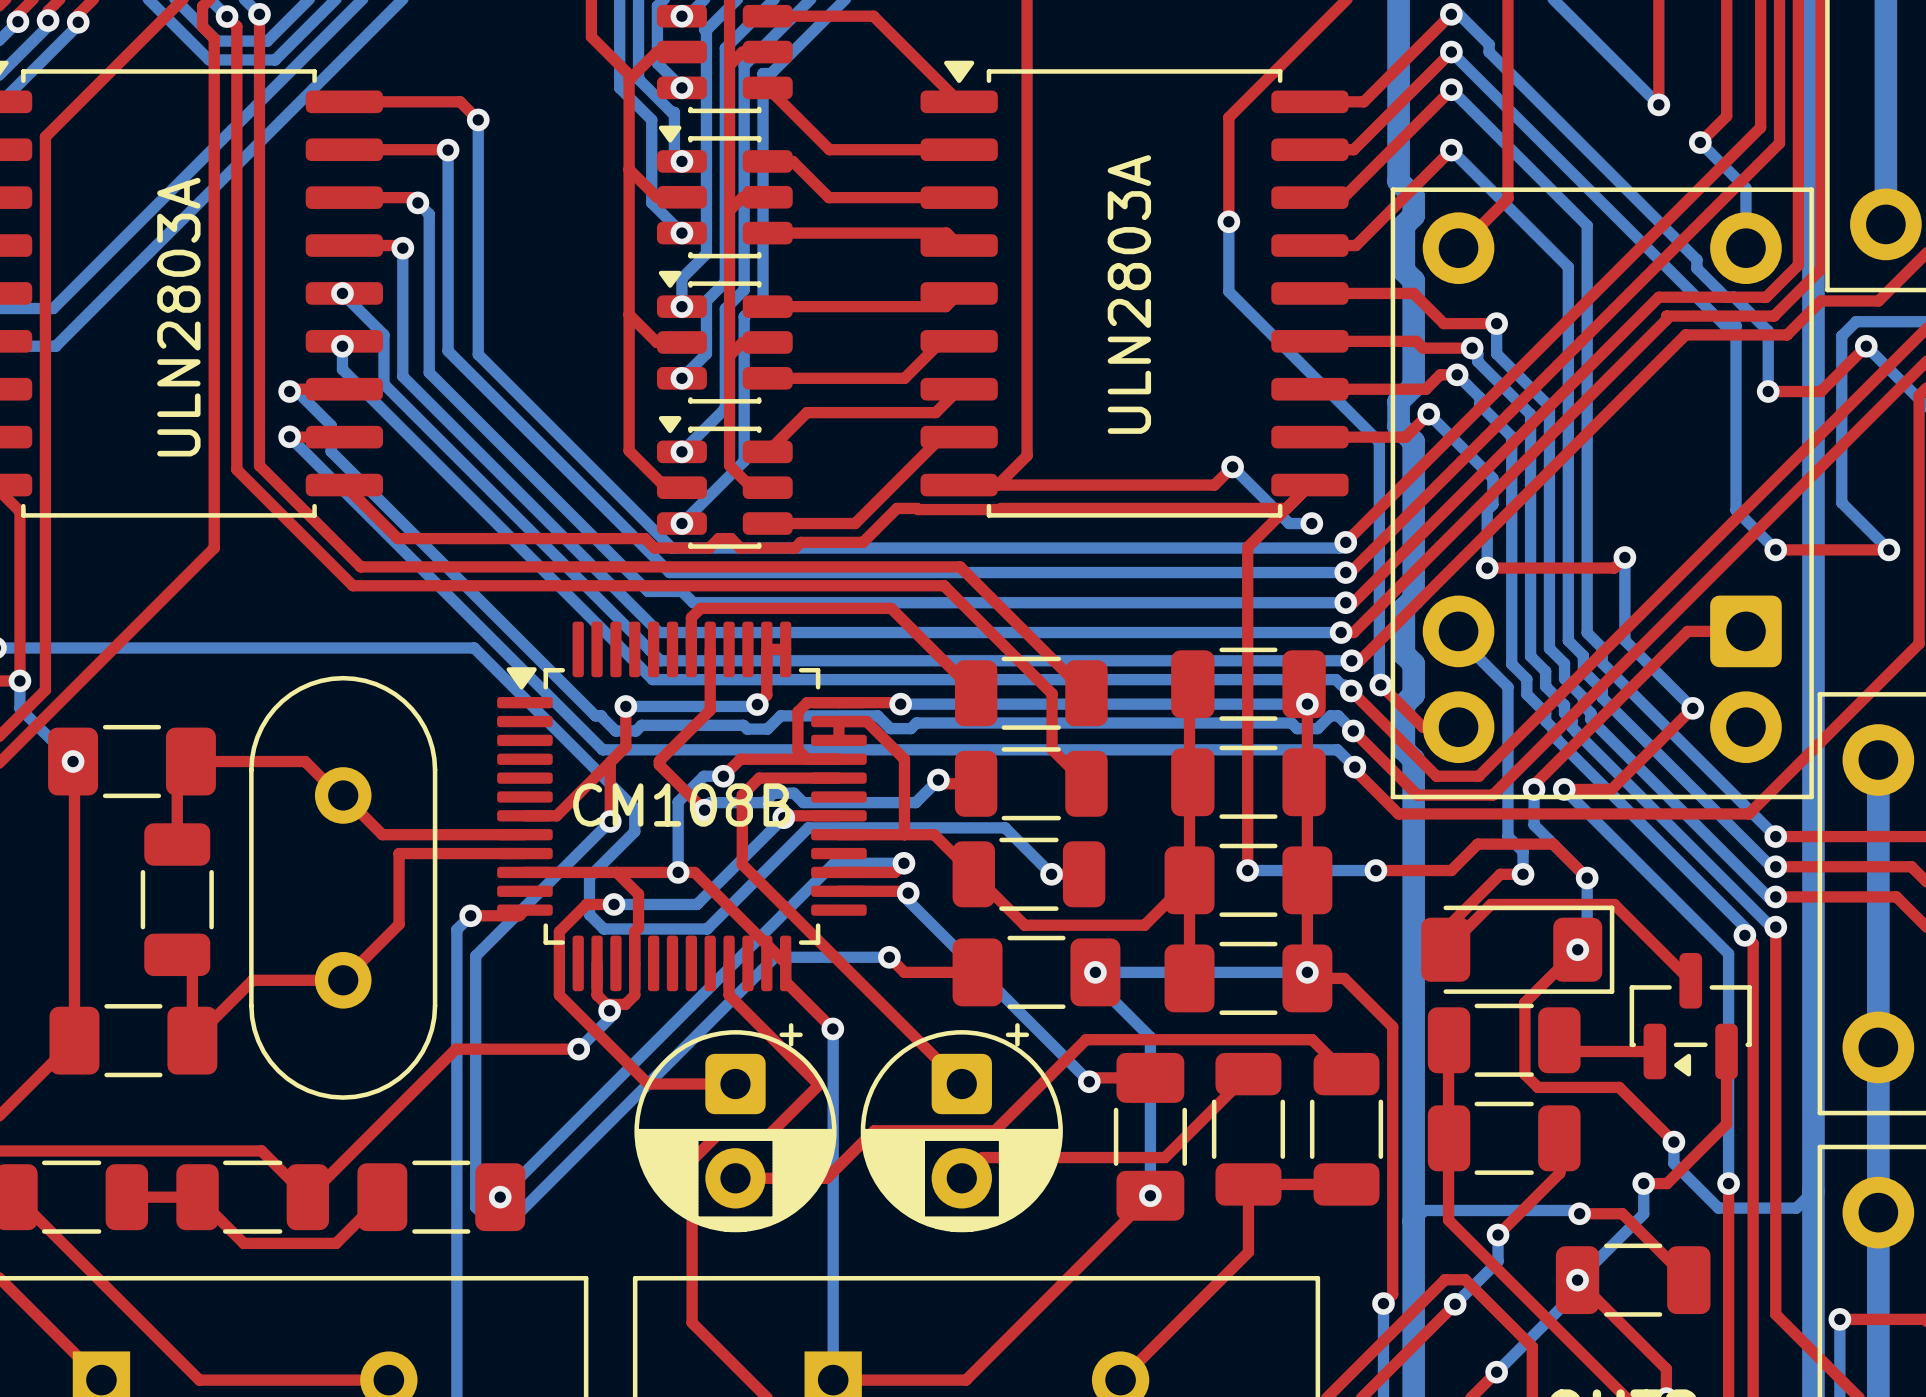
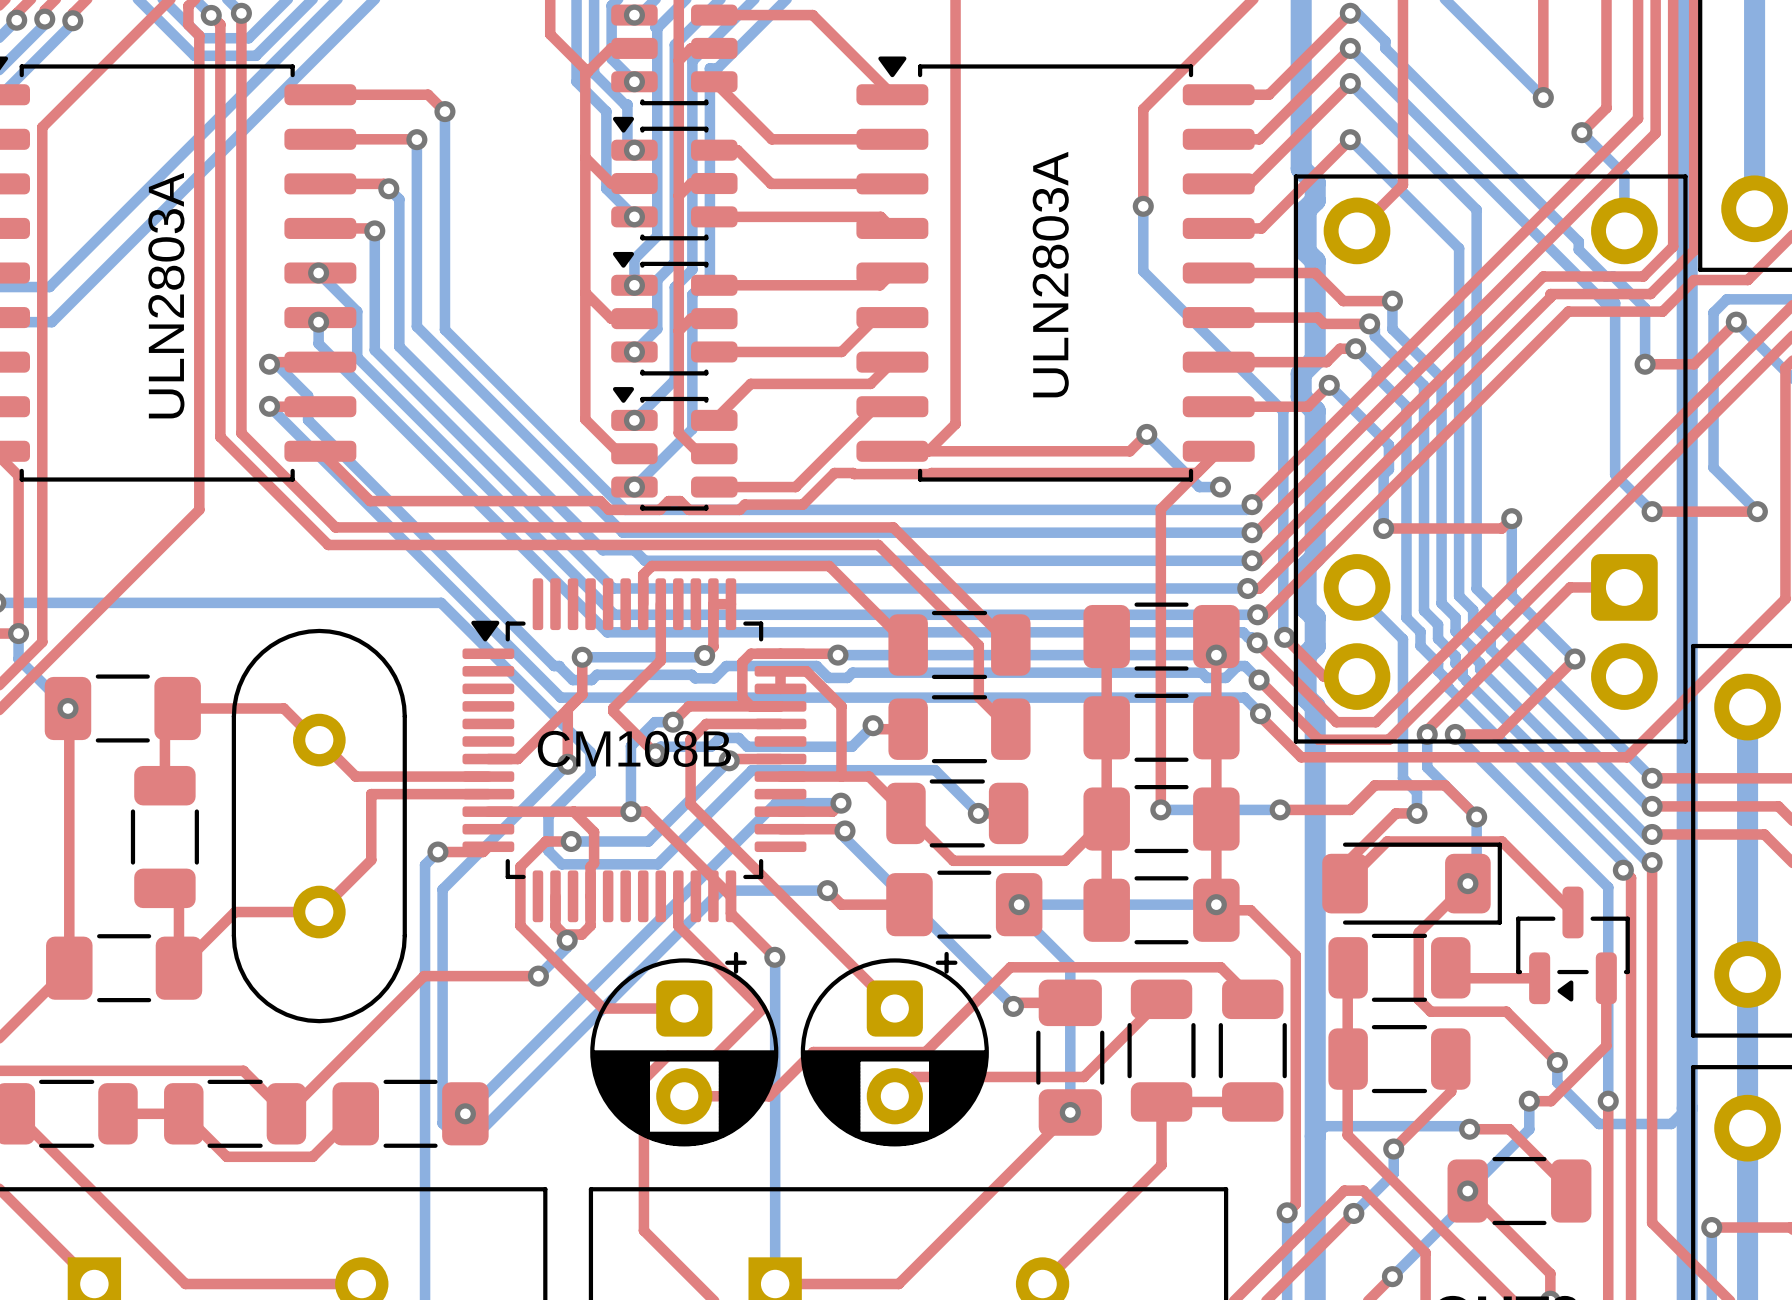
part footprint: [1171, 647, 1326, 721] -> [1083, 602, 1240, 671]
part footprint: [1171, 745, 1326, 819] -> [1083, 693, 1240, 762]

